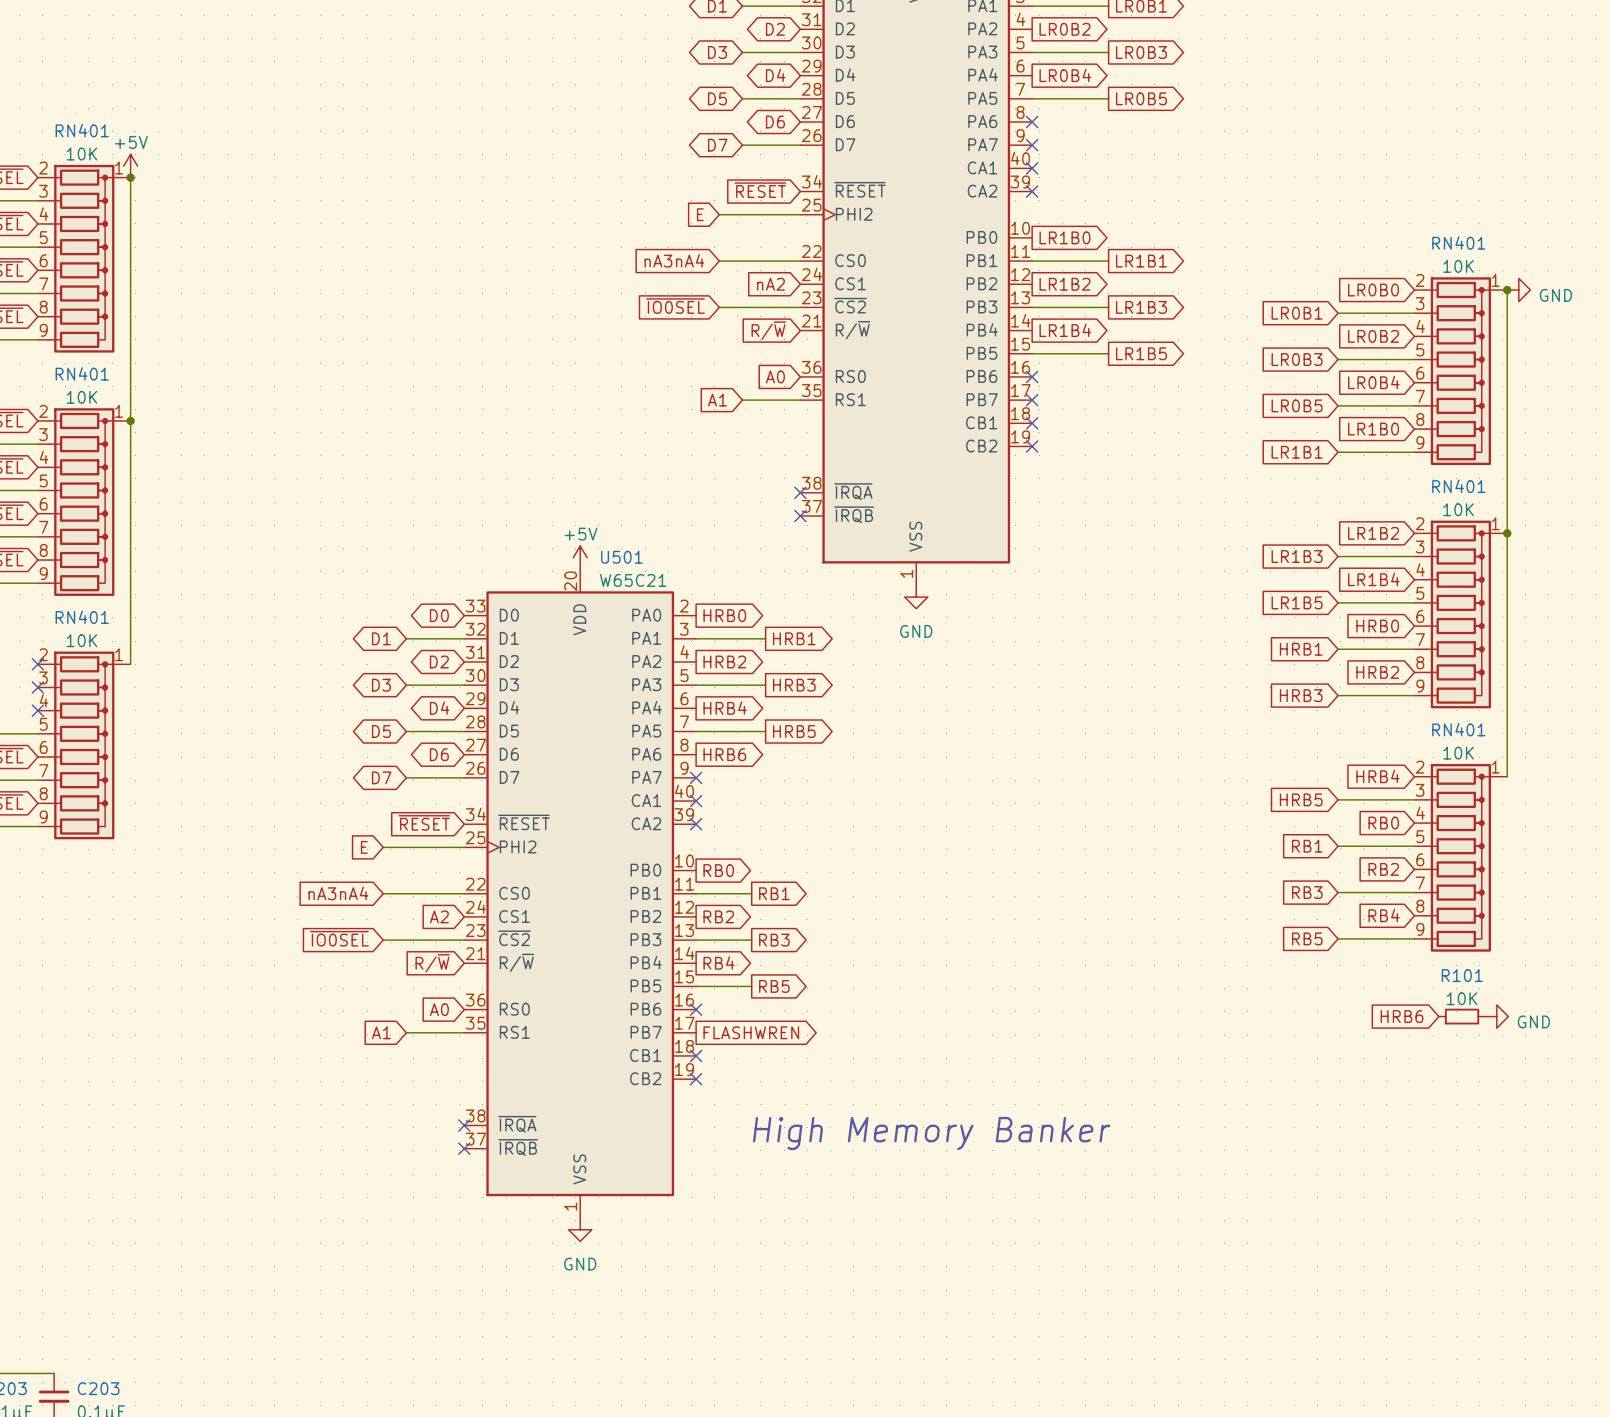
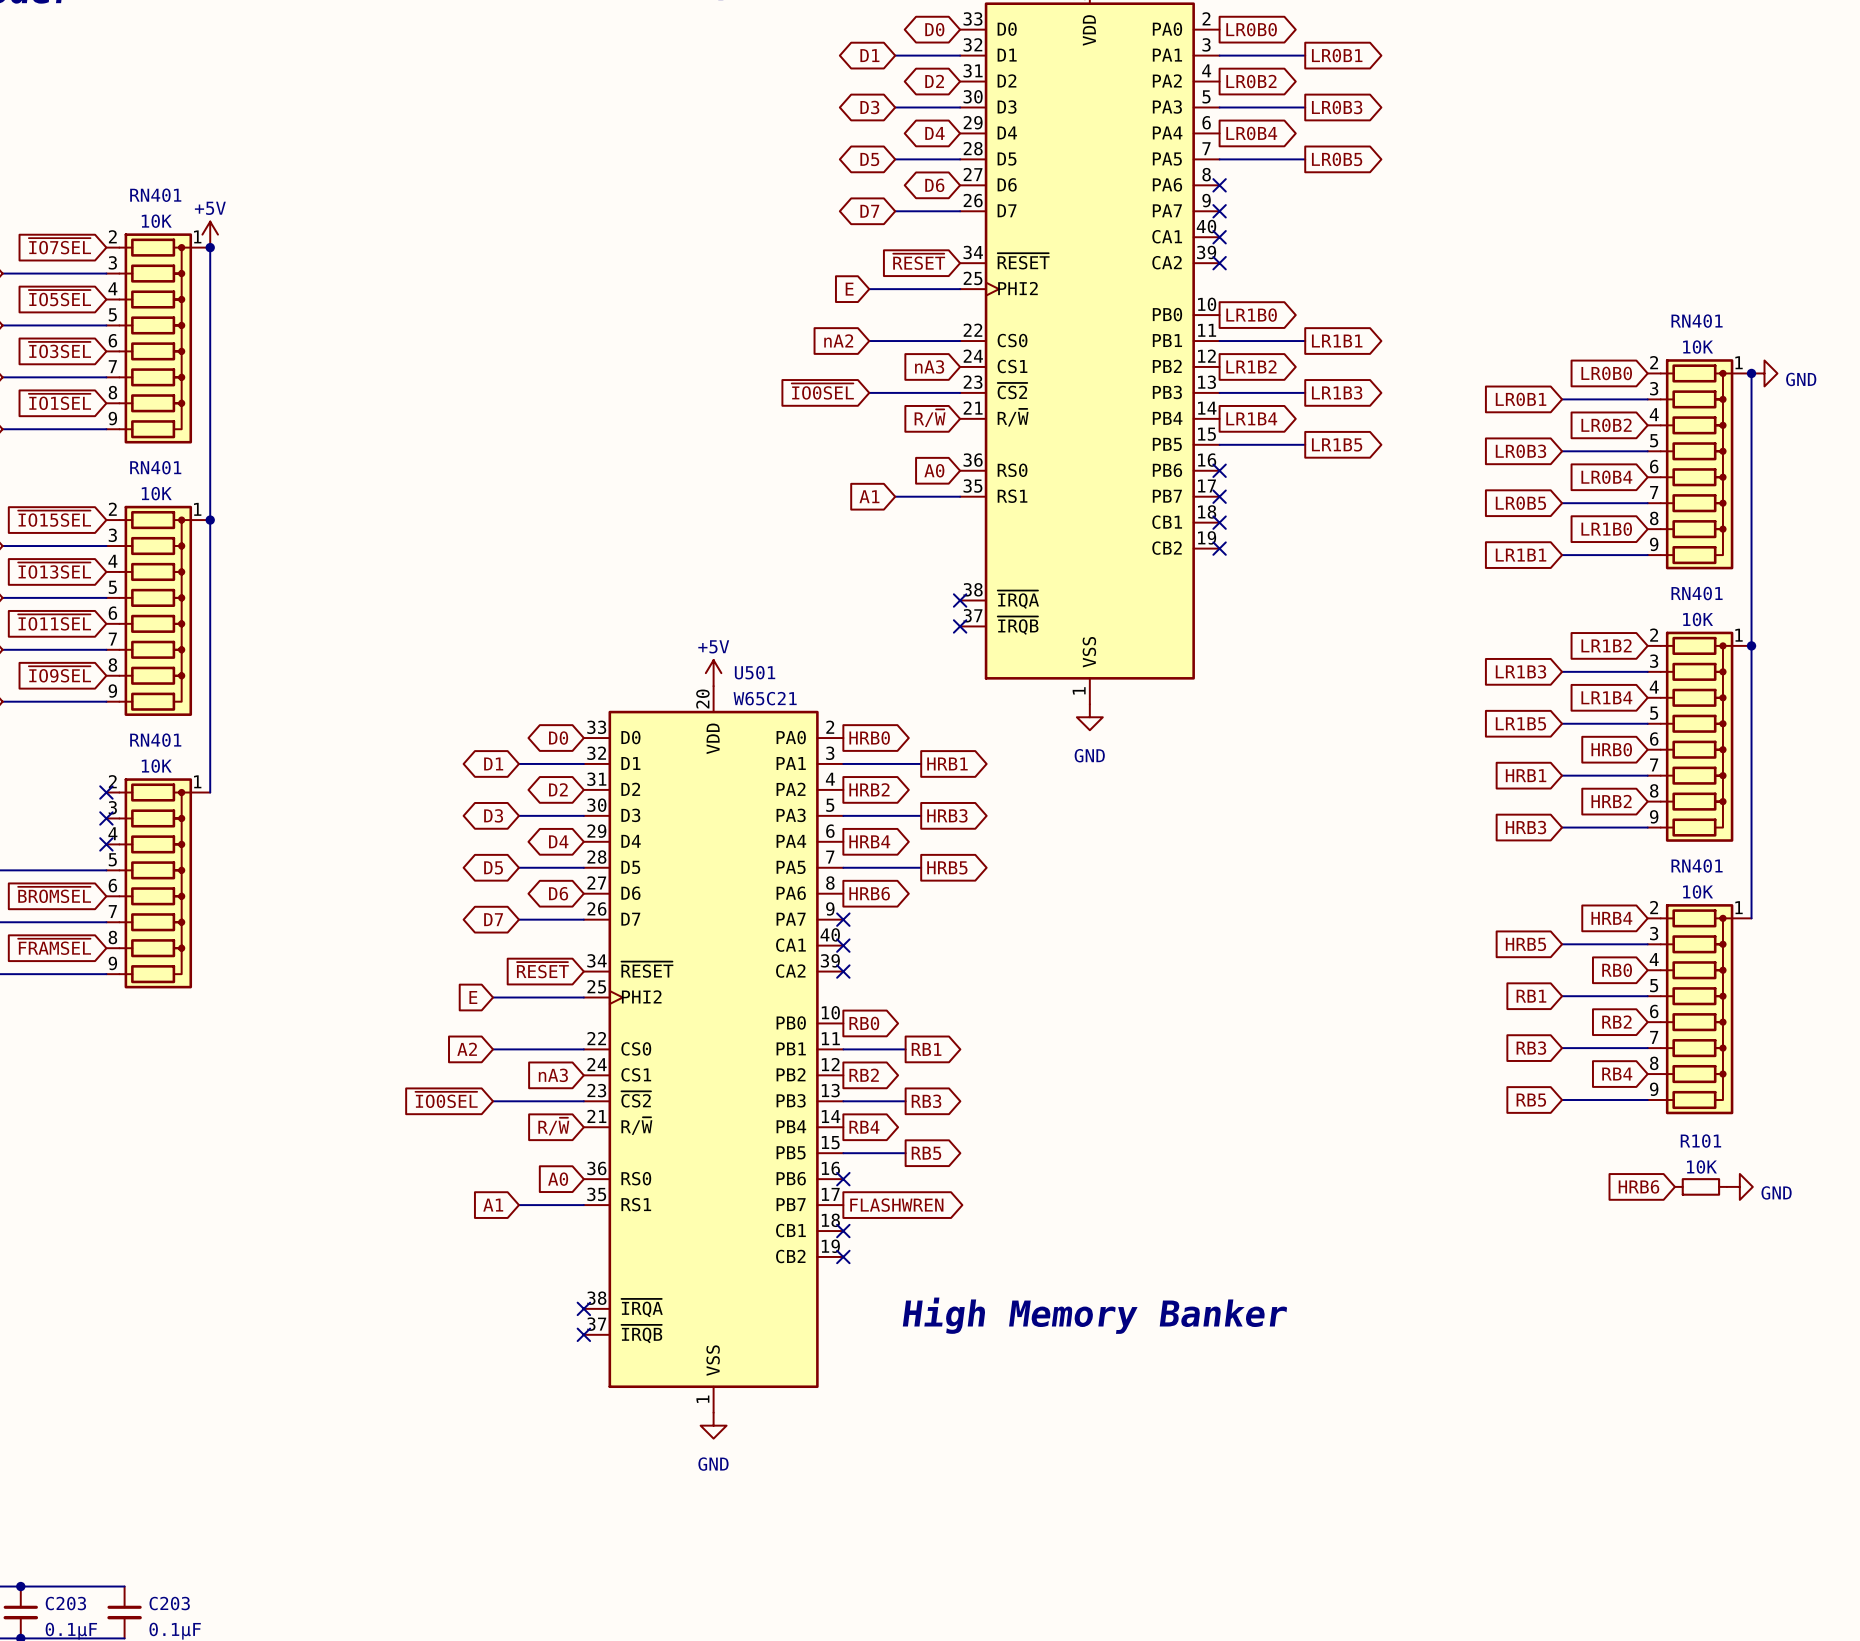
global label: nA3nA4 (674, 260) -> nA2 (838, 340)
global label: nA2 (770, 284) -> nA3 (929, 366)
global label: nA3nA4 (338, 893) -> A2 (467, 1049)
global label: A2 (439, 916) -> nA3 (553, 1075)

